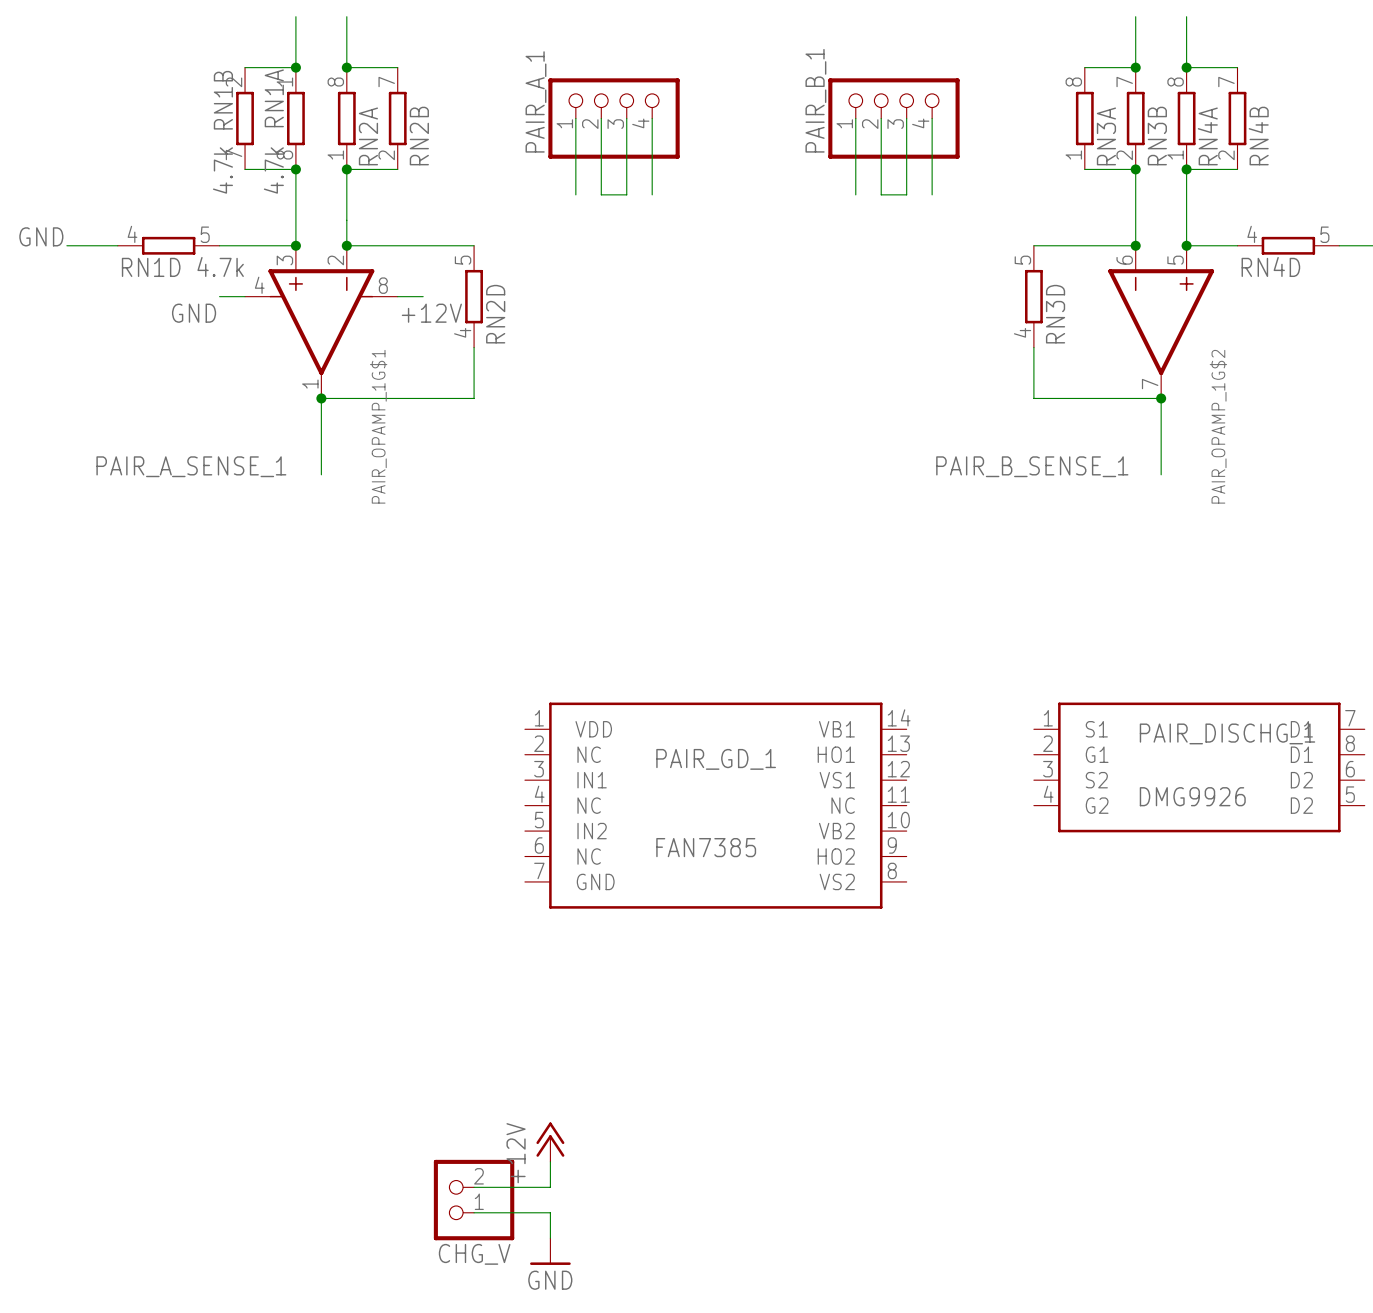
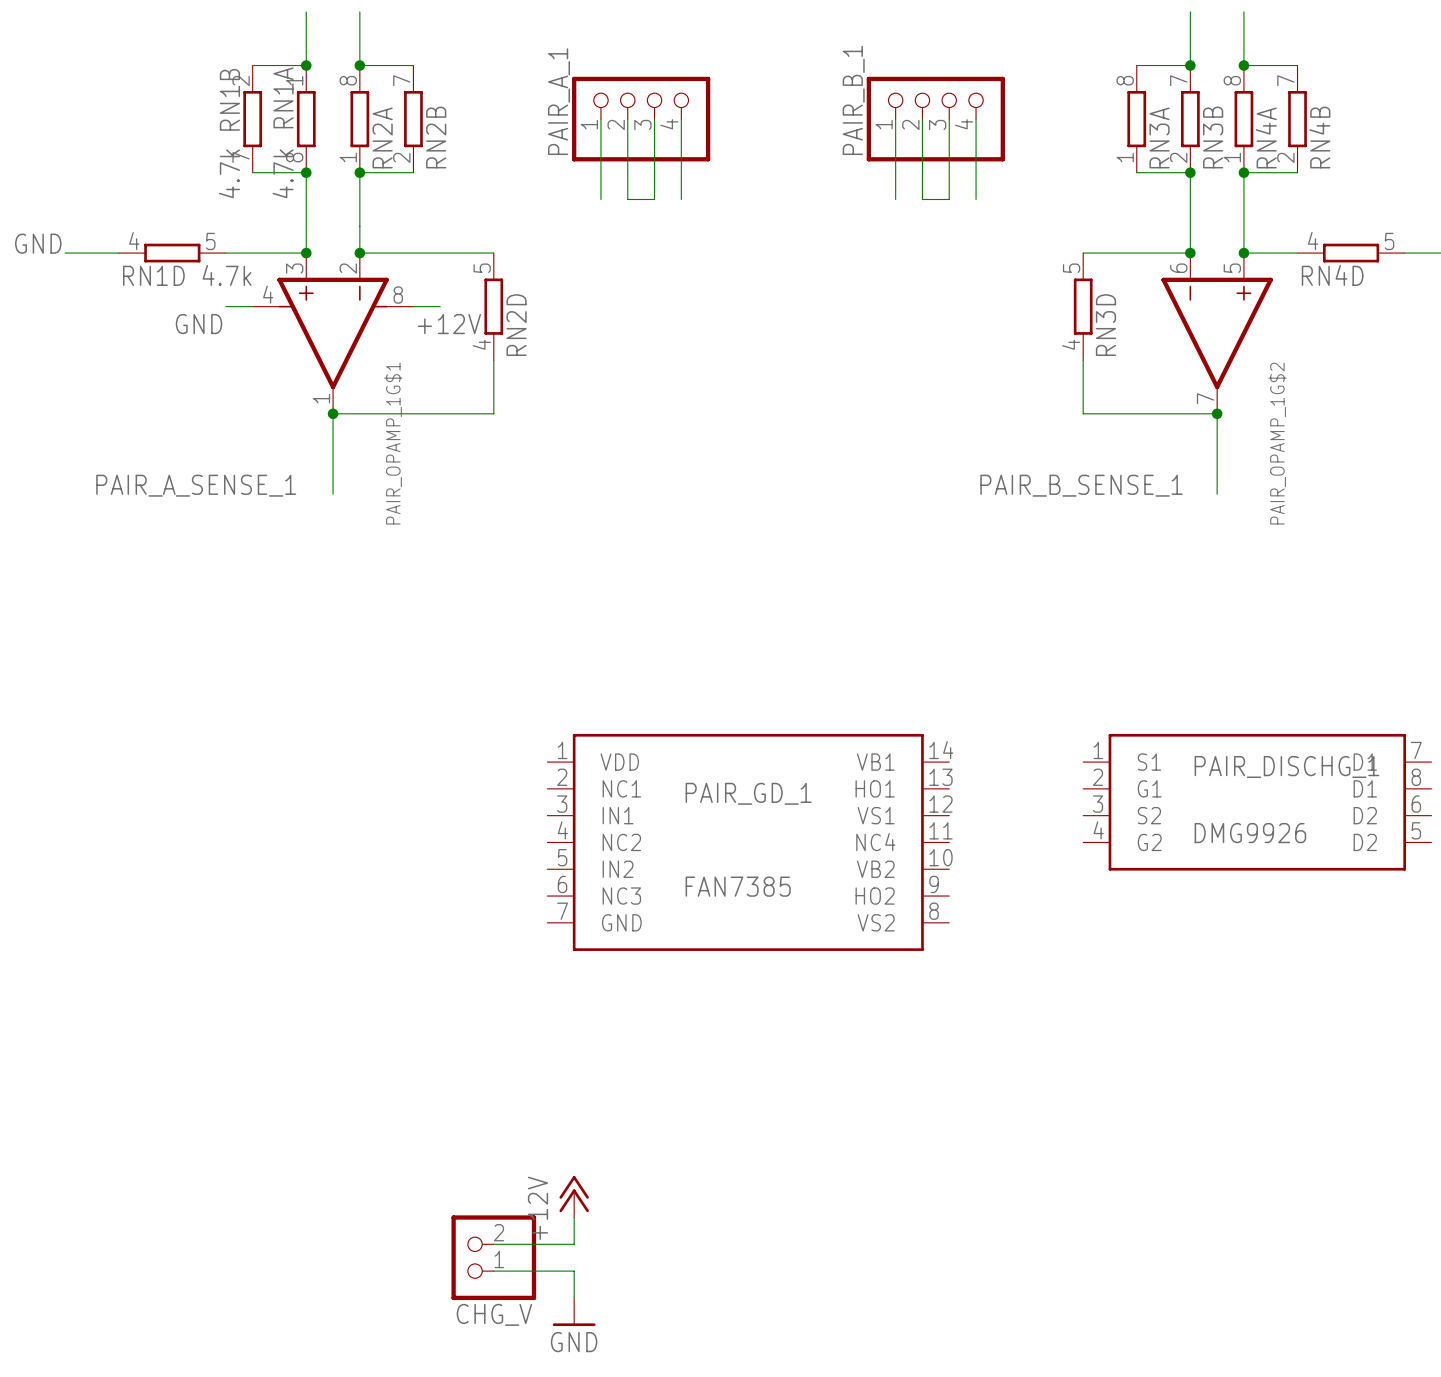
PAIR_GD_1 pin name: NC (589, 754) -> NC1 (621, 788)
PAIR_GD_1 pin name: NC (589, 805) -> NC2 (621, 842)
PAIR_GD_1 pin name: NC (843, 805) -> NC4 (875, 842)
PAIR_GD_1 pin name: NC (589, 856) -> NC3 (621, 896)

